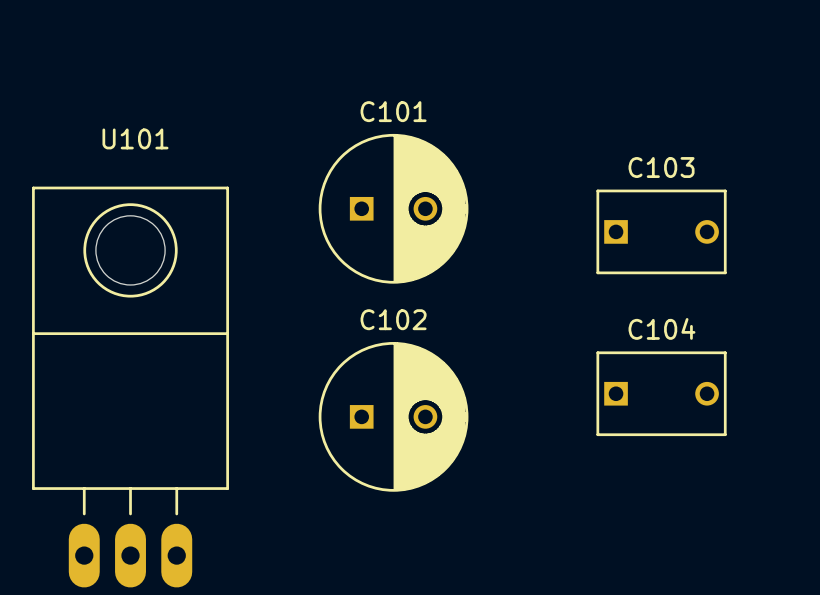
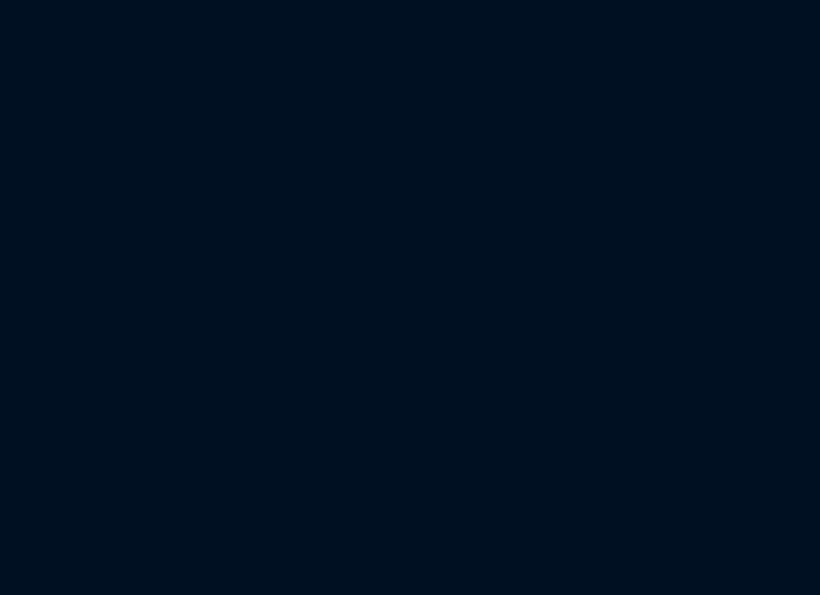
C101: (393, 208) -> none
C103: (661, 231) -> none
U101: (130, 387) -> none
C104: (661, 393) -> none
C102: (393, 416) -> none

